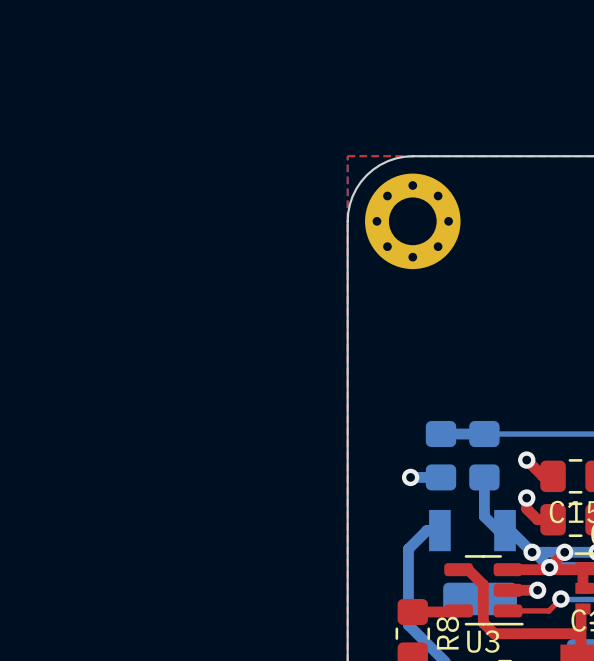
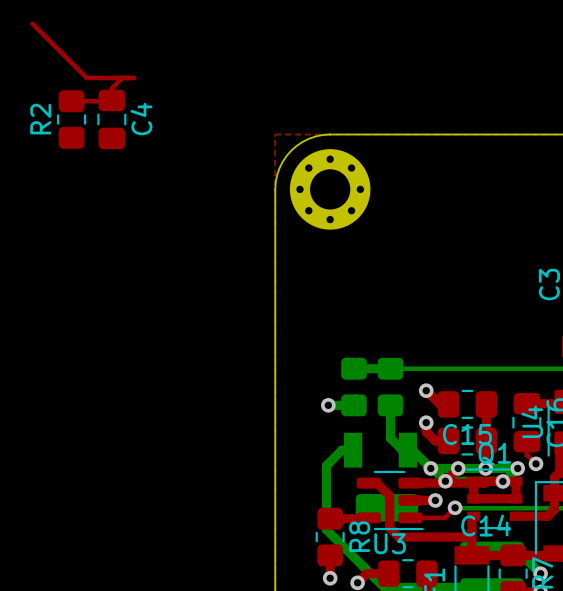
top track: none -> (32, 23) (86, 77) (134, 77)
top track: none -> (122, 77) (111, 88) (111, 101) (71, 101)
R2: none -> (71, 119)
C4: none -> (111, 119)

